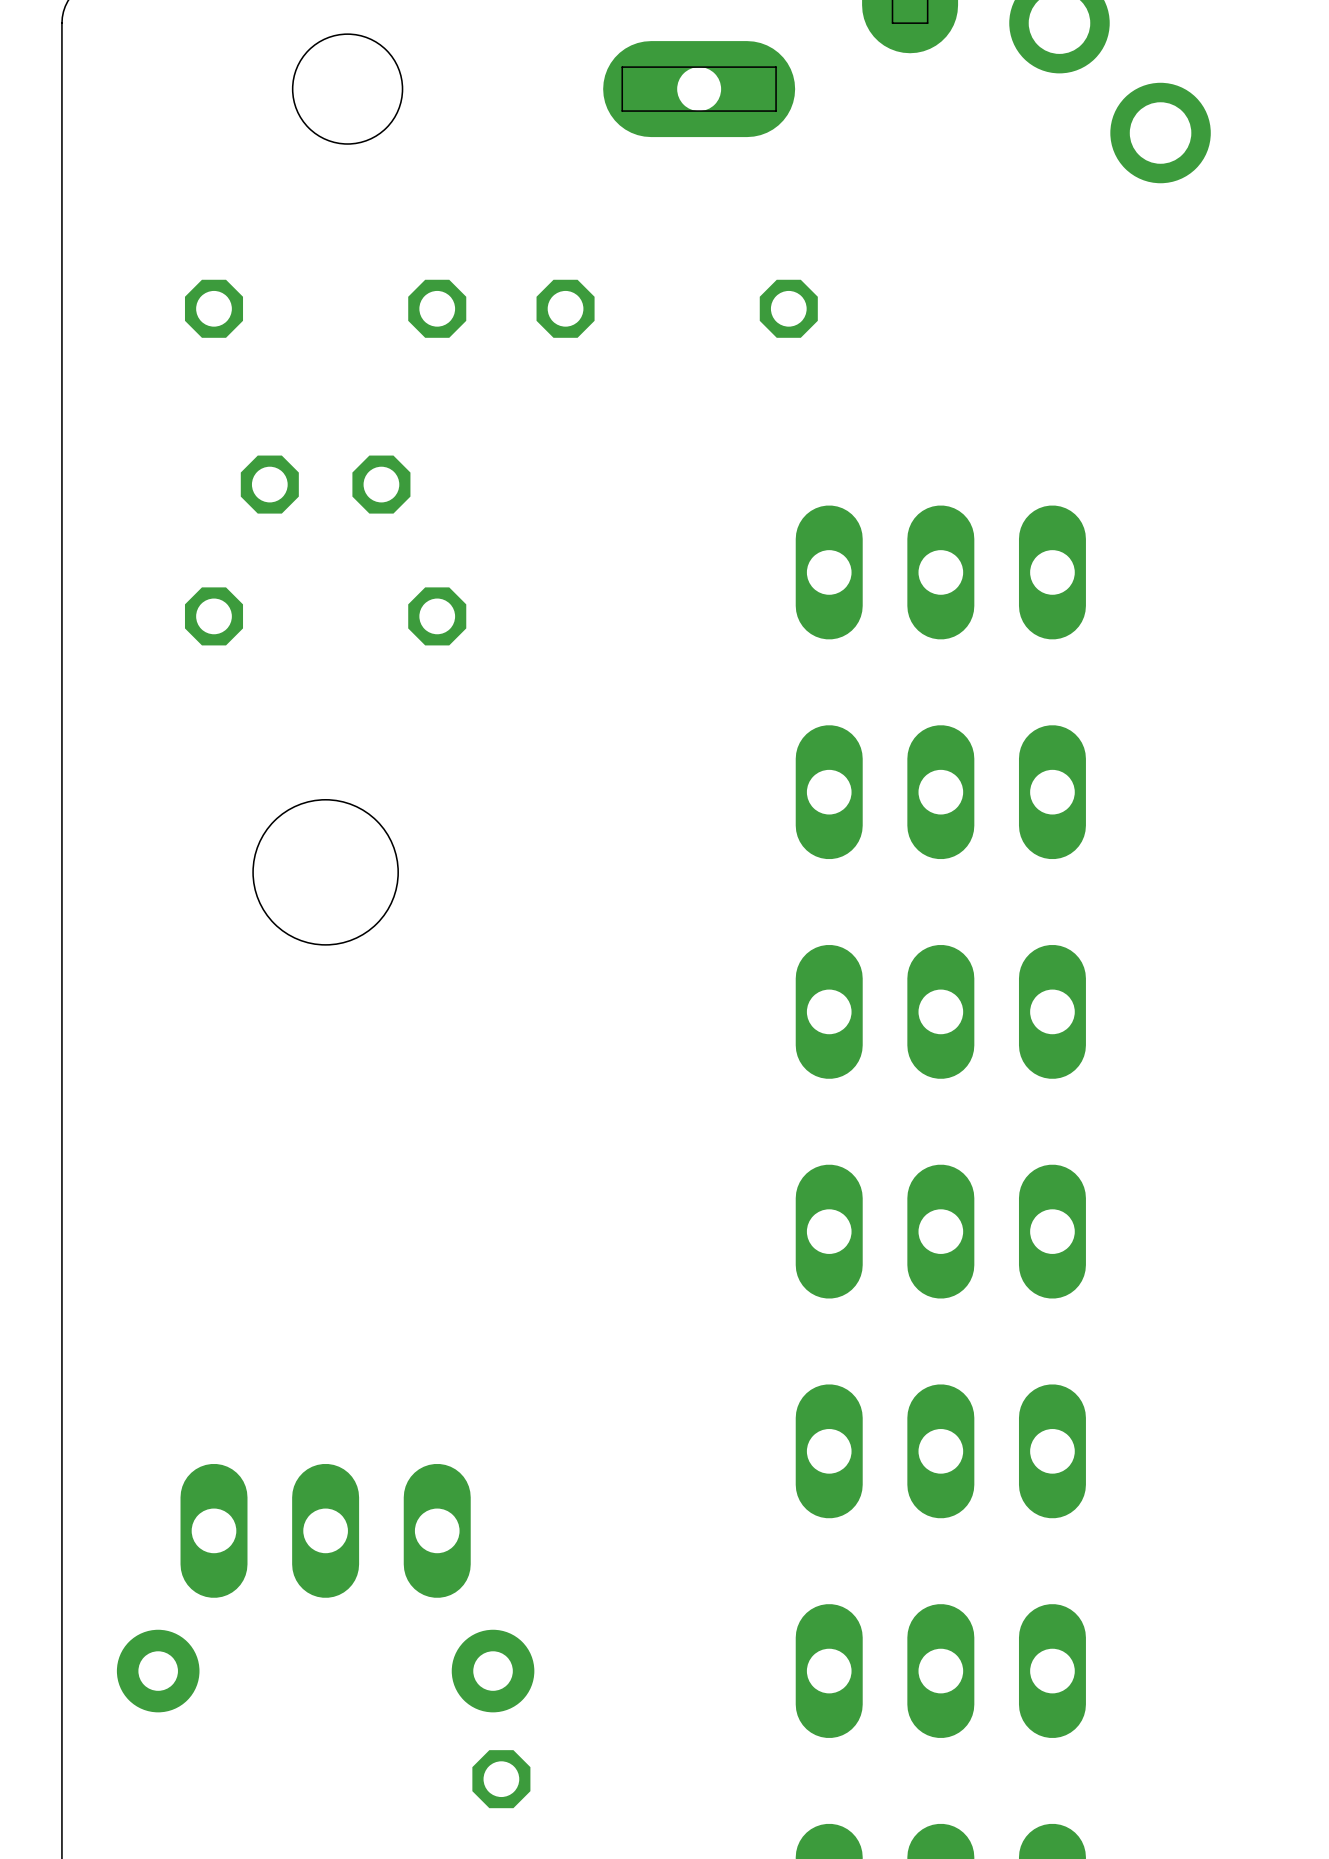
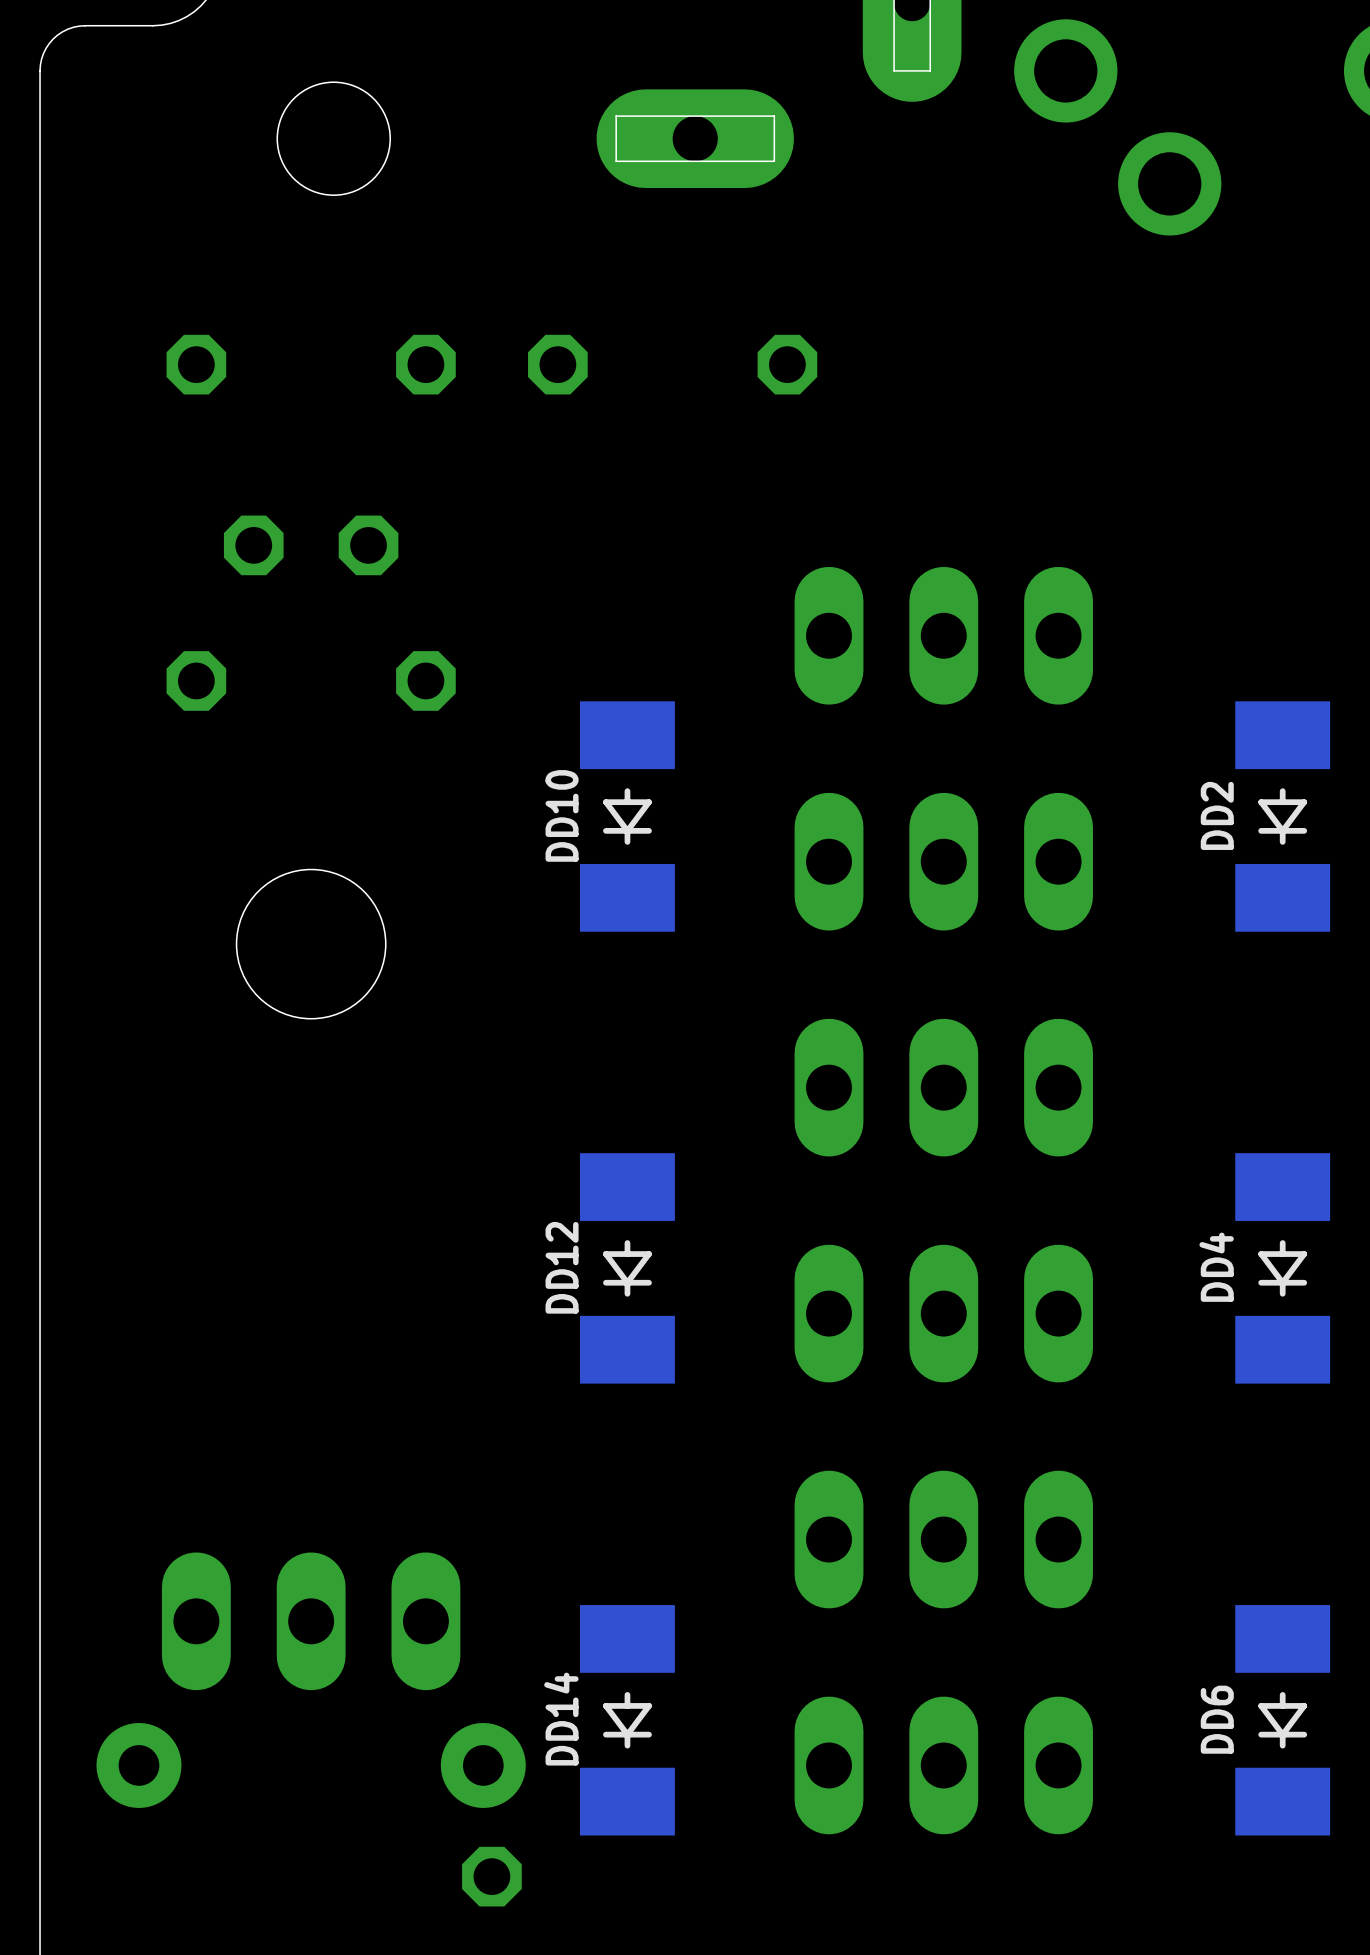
DD10: none -> (627, 816)
DD2: none -> (1282, 816)
DD12: none -> (627, 1268)
DD4: none -> (1282, 1268)
DD14: none -> (627, 1720)
DD6: none -> (1282, 1720)

